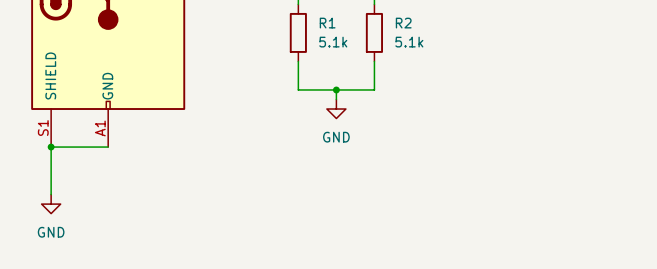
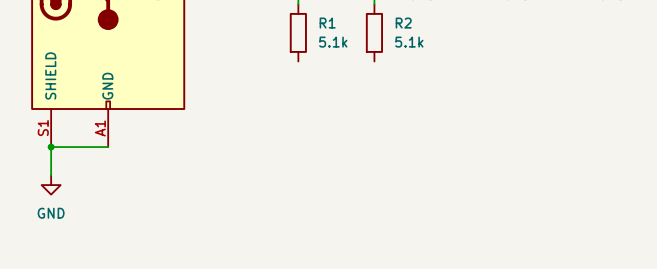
wire: (298, 61) (298, 89) (374, 89) (374, 61) -> none
wire: (336, 89) (336, 99) -> none
junction: (336, 89) -> none
power symbol: GND (336, 109) -> none
power symbol position: GND (51, 204) -> GND (51, 185)

